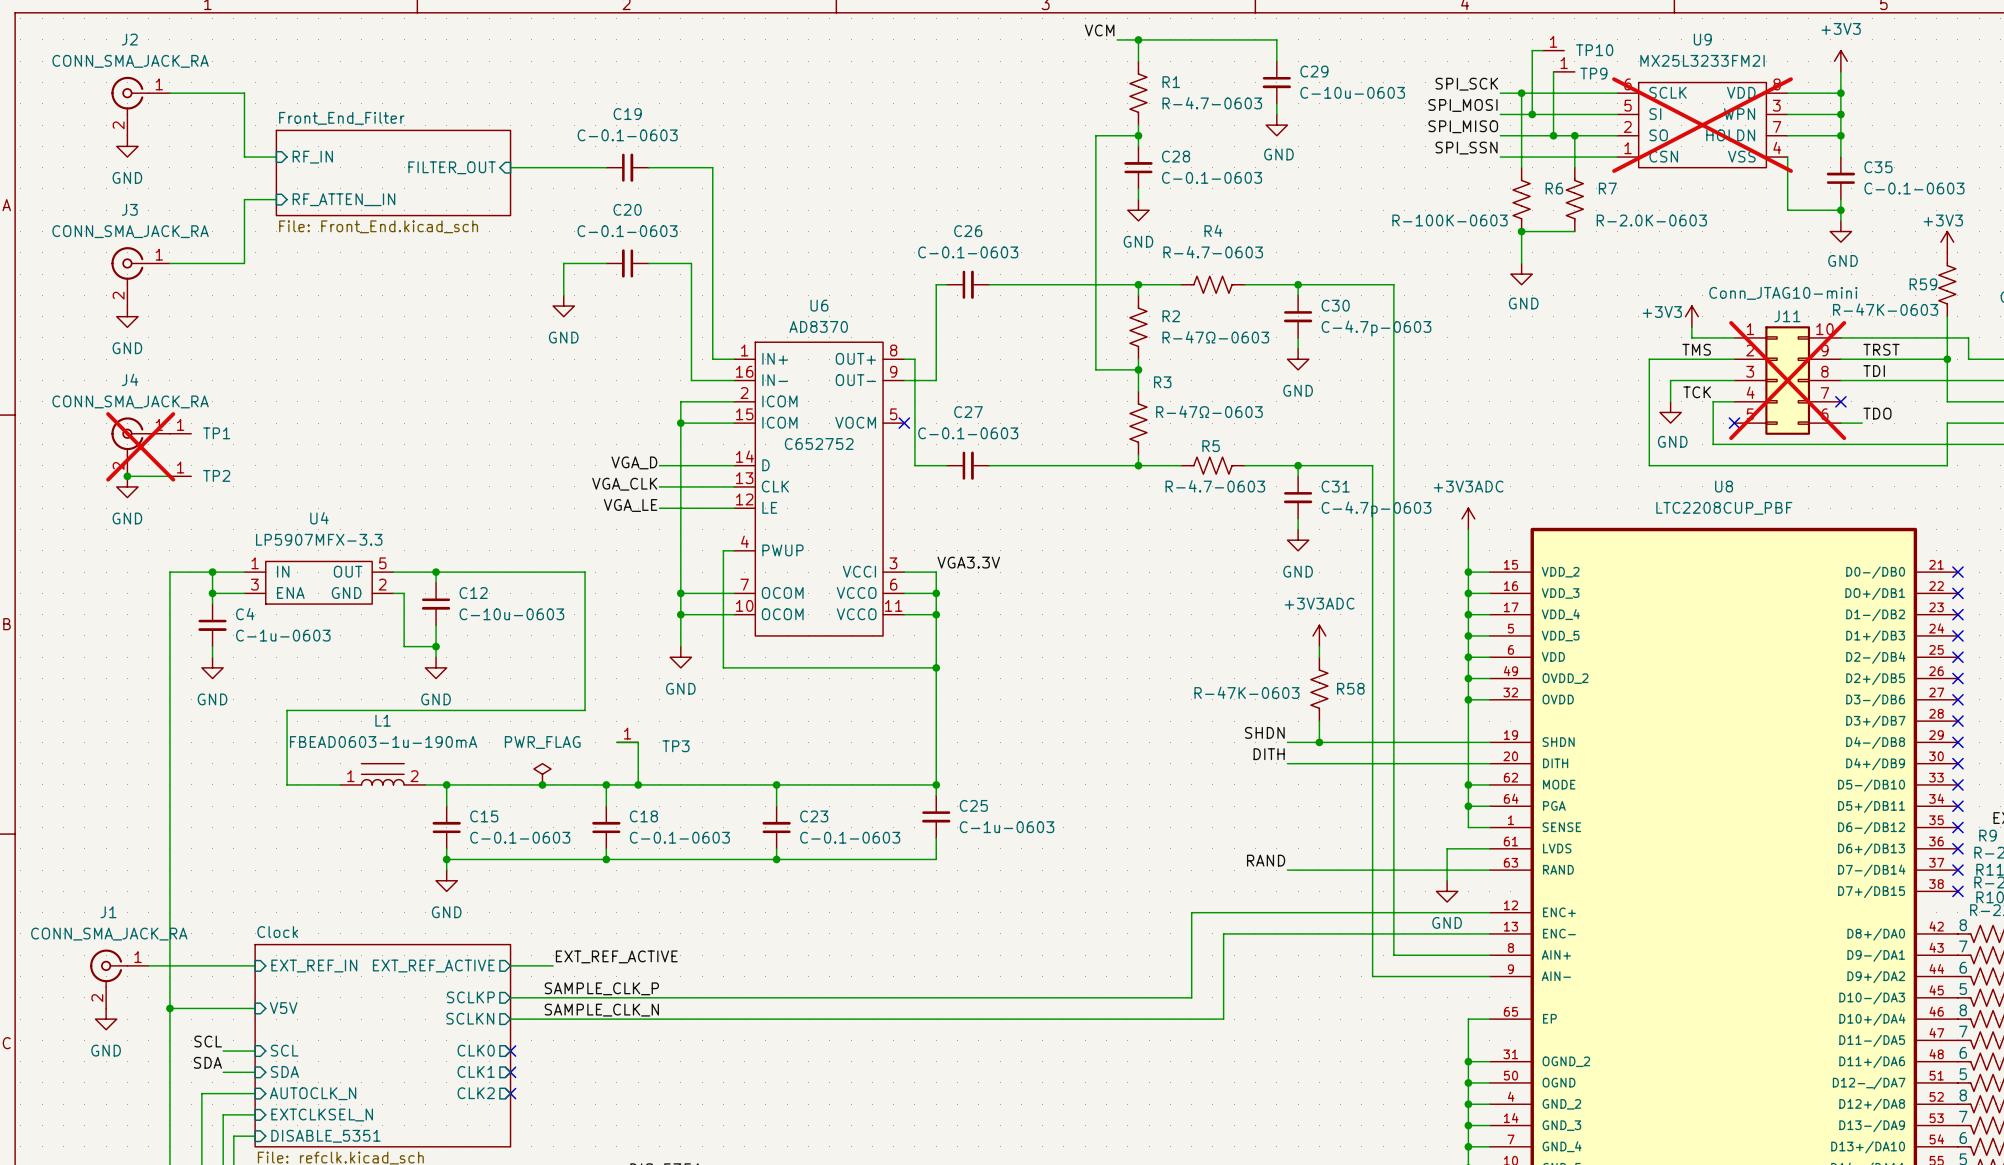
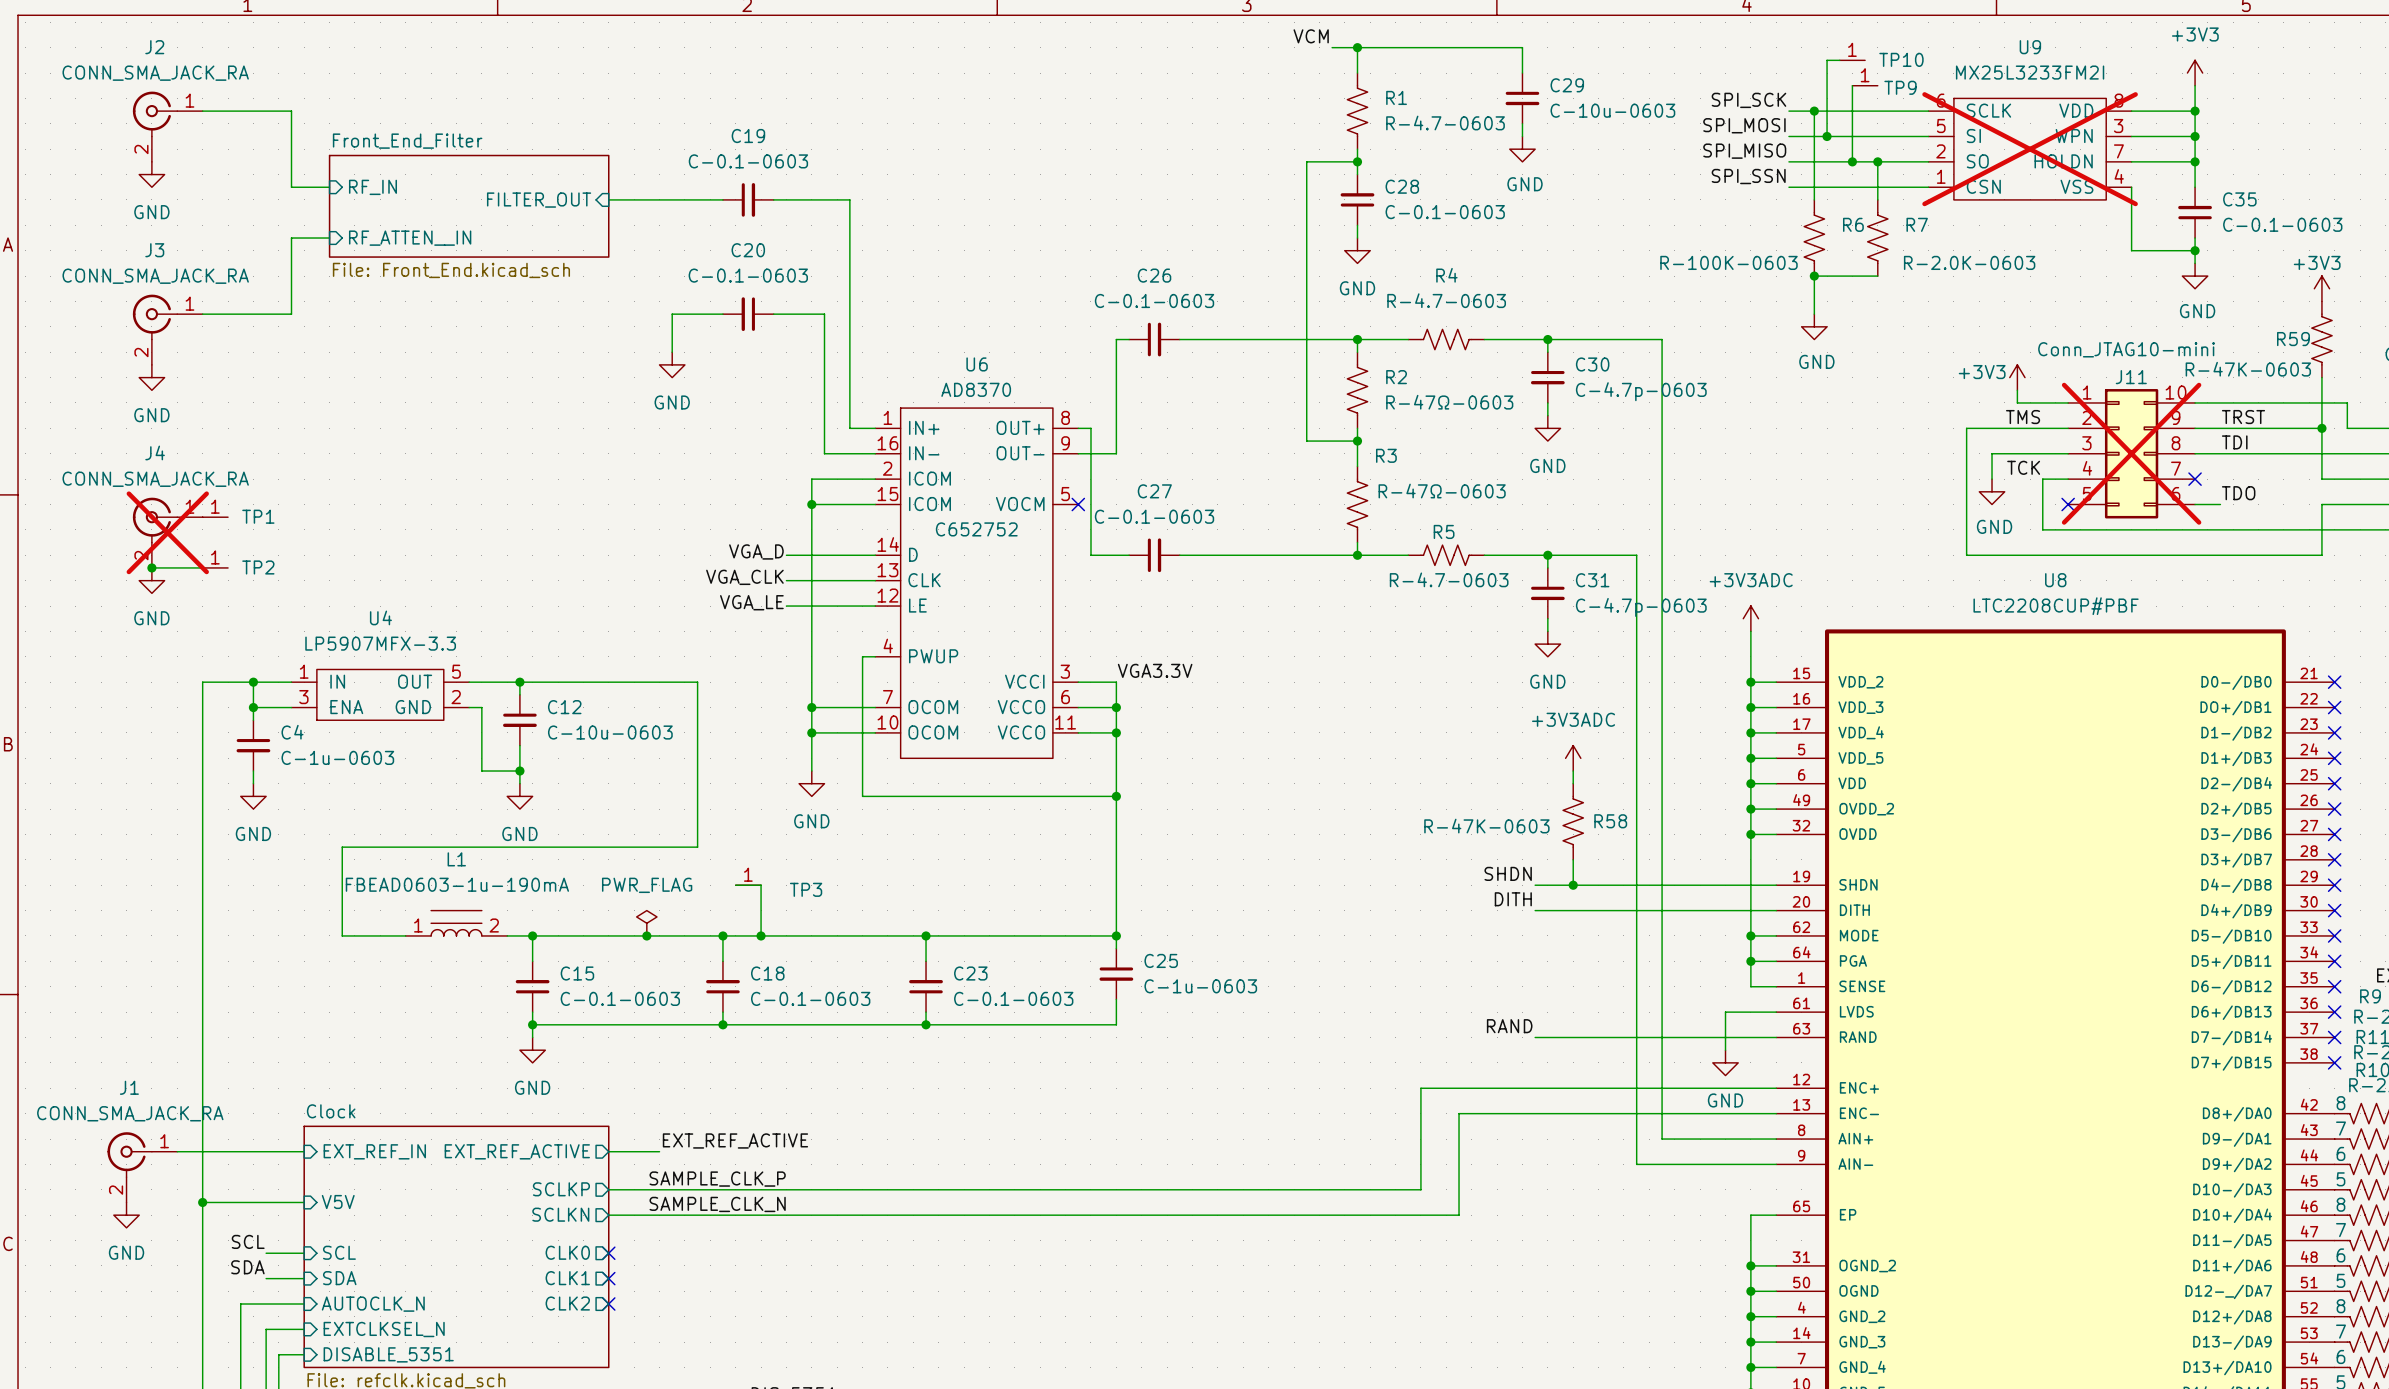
U8 value: LTC2208CUP_PBF (1724, 508) -> LTC2208CUP#PBF (2056, 606)

